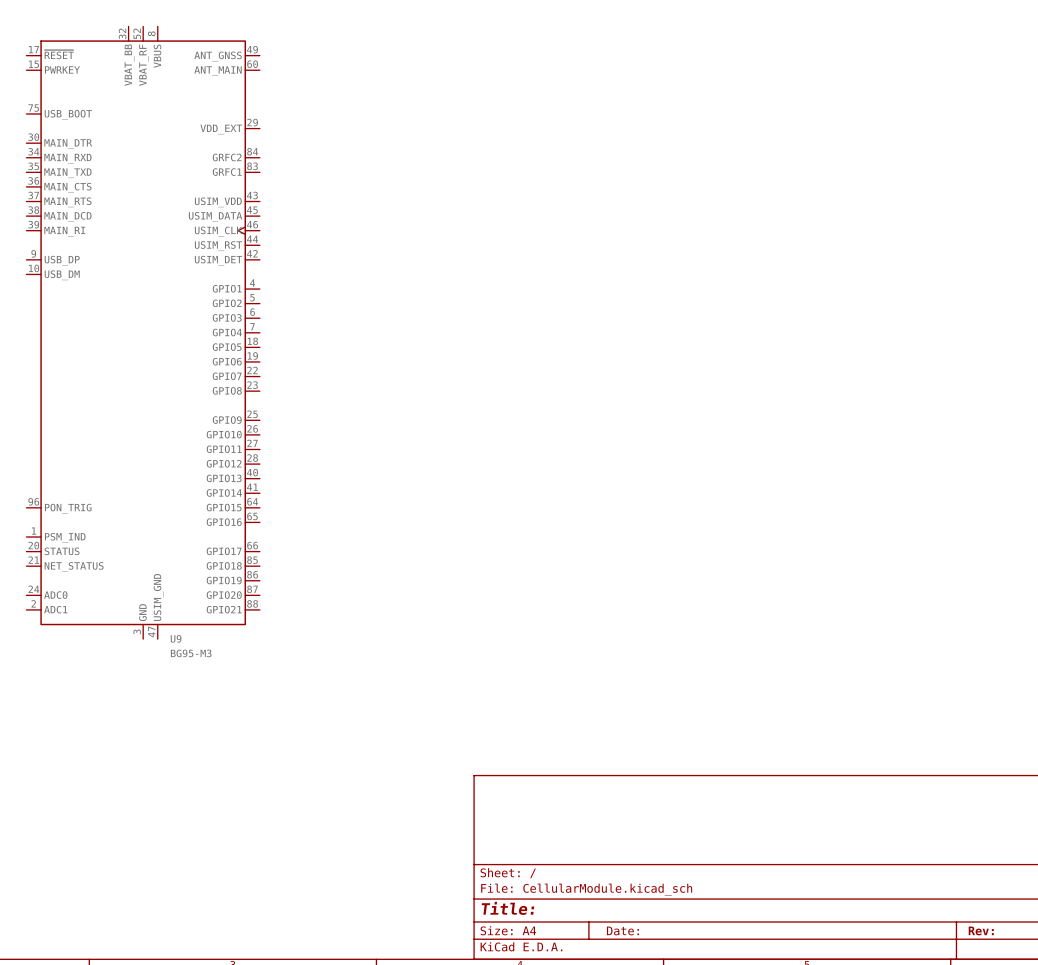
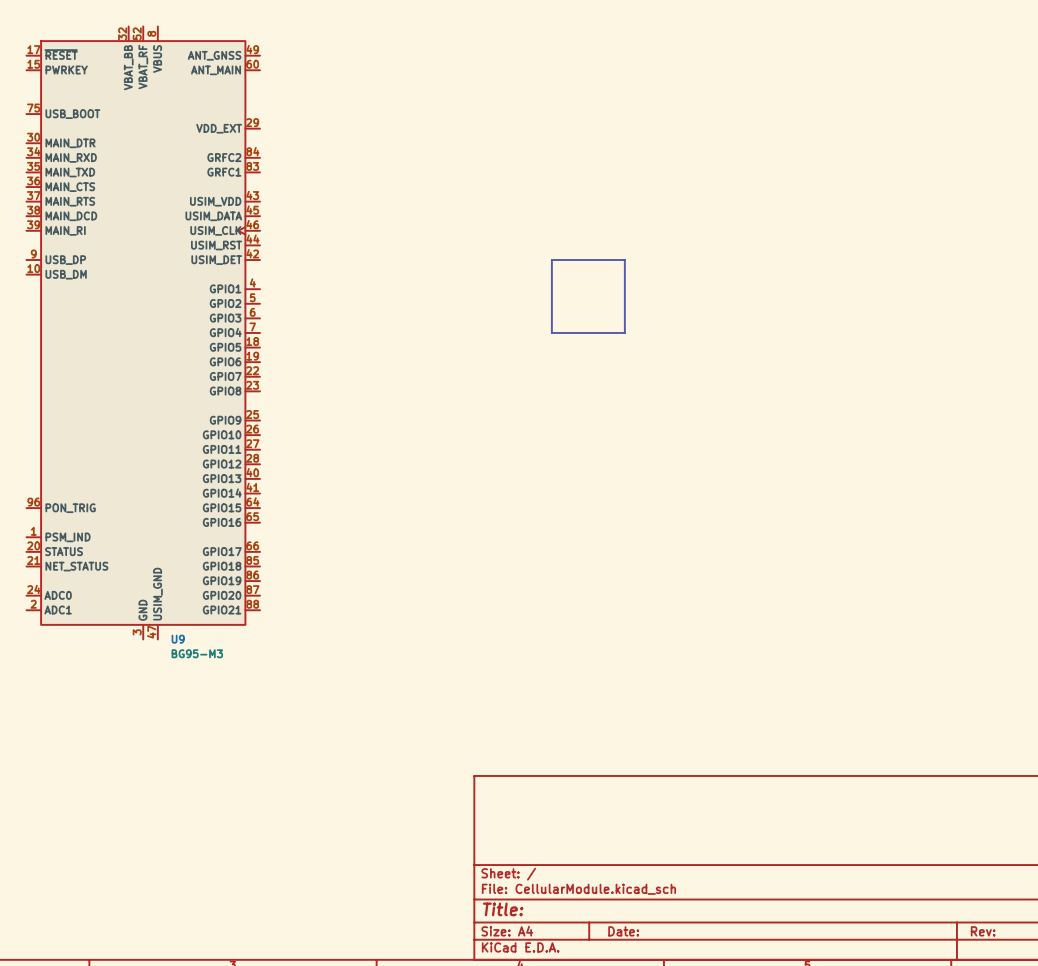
line: none -> (551, 260) (624, 260) (624, 332) (551, 332) (551, 260)

